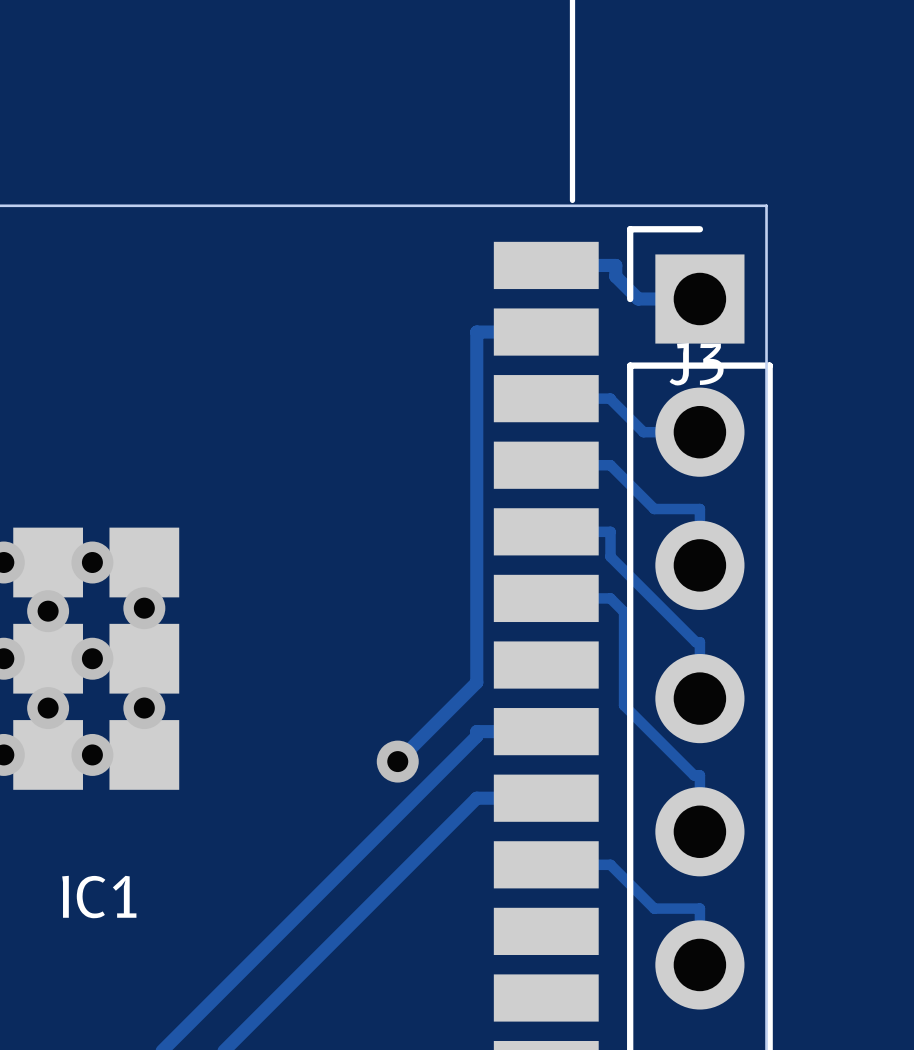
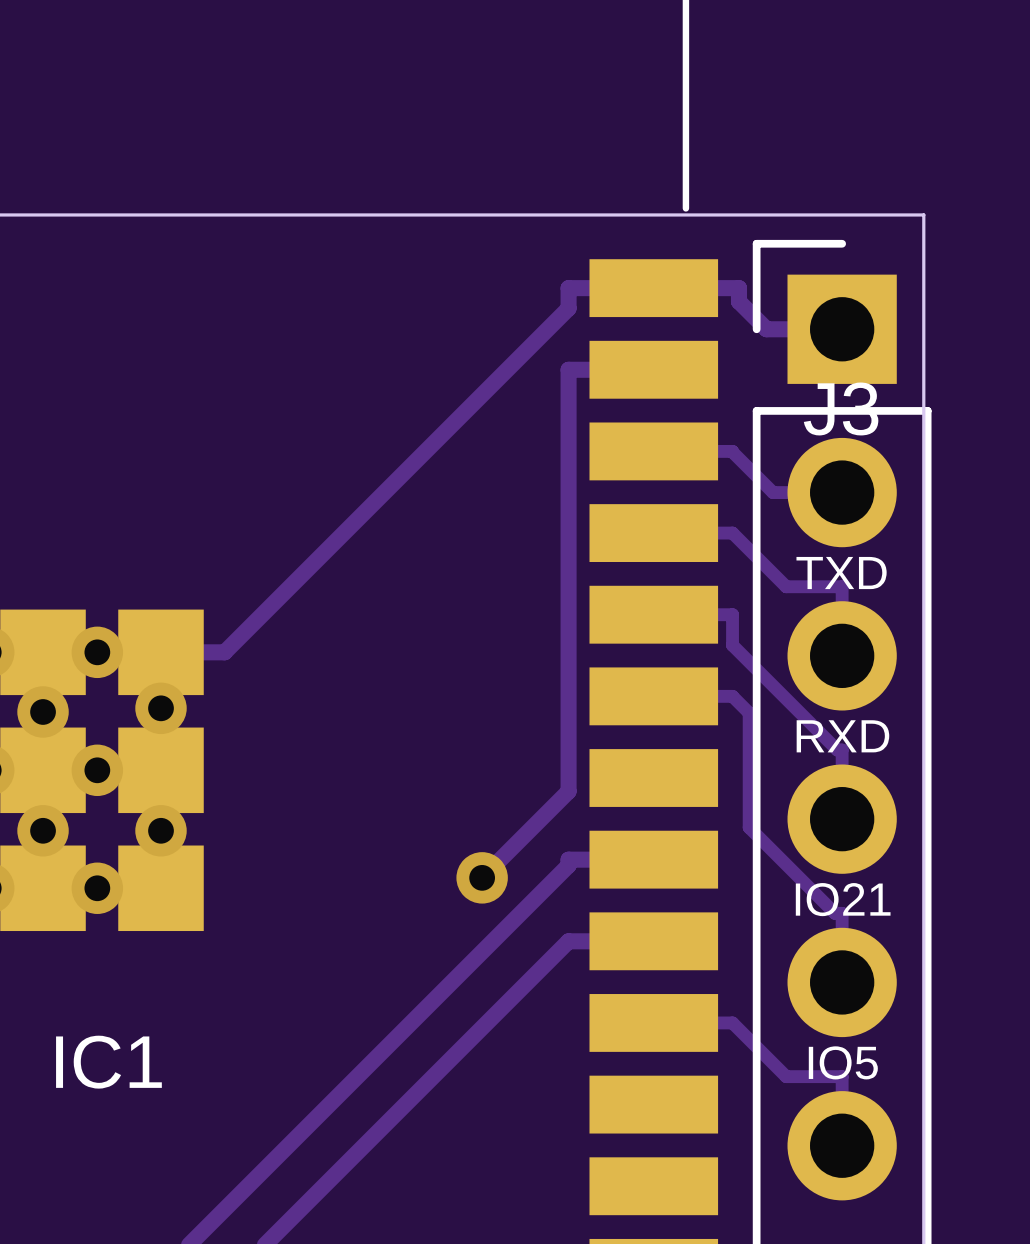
track: none -> (611, 288) (568, 288) (568, 308) (224, 652) (161, 652)
text: none -> TXD (841, 573)
text: none -> RXD (842, 736)
track: (476, 675) (476, 682) (397, 761) -> (568, 791) (482, 877)
via position: (397, 761) -> (482, 877)
text: none -> IO21 (843, 899)
text: none -> IO5 (843, 1062)

